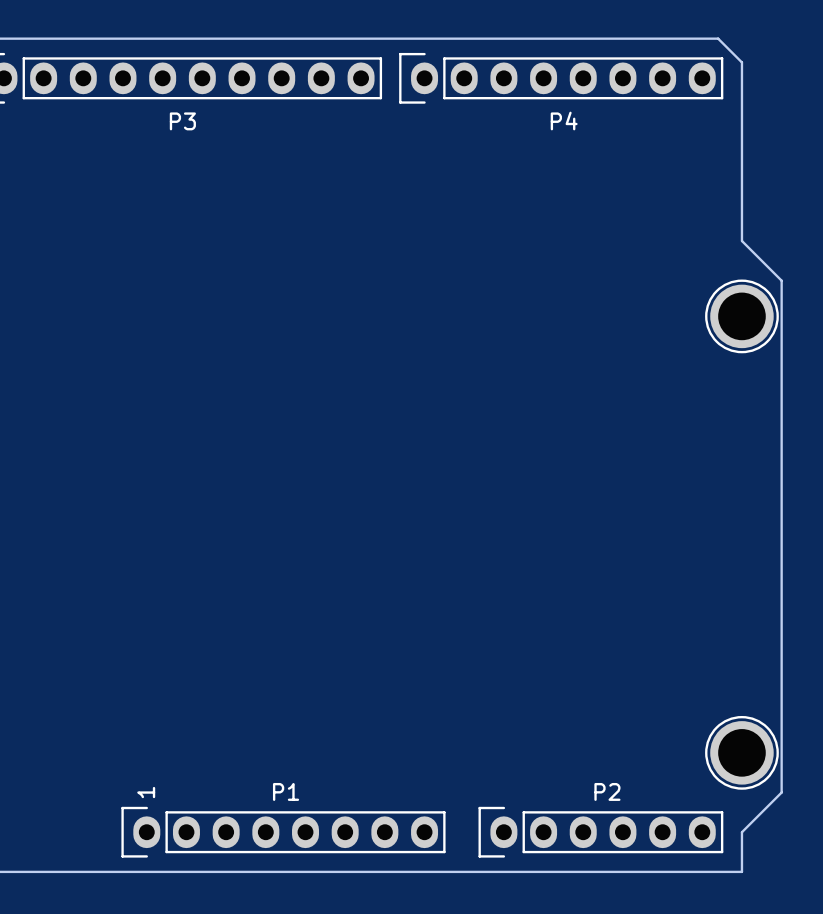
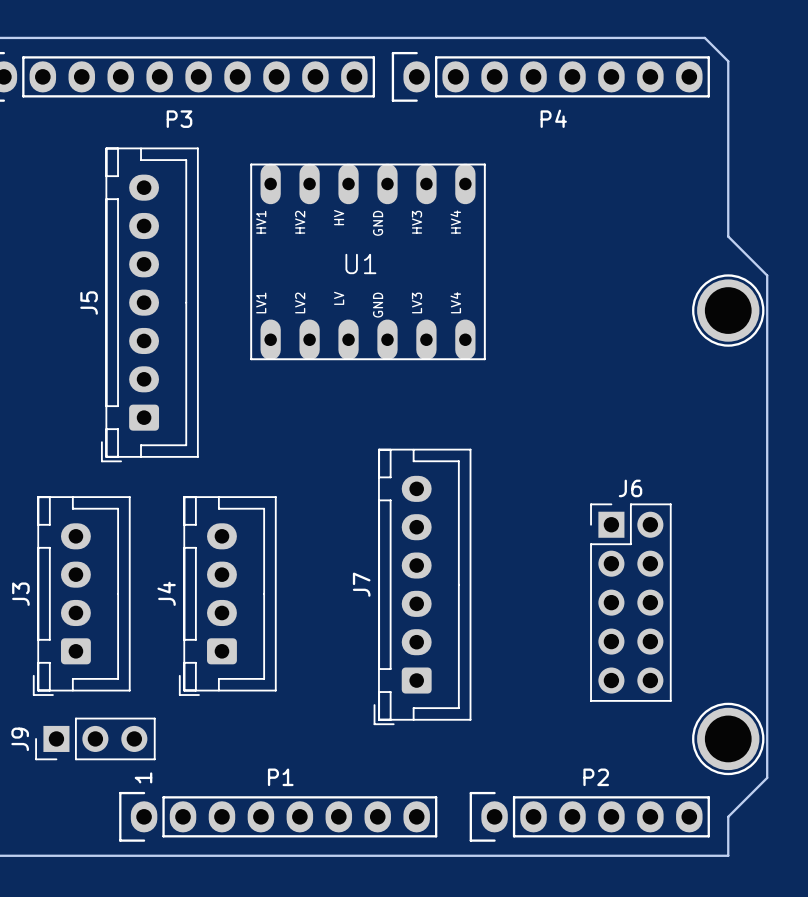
U1: none -> (368, 261)
J5: none -> (149, 304)
J7: none -> (422, 586)
J3: none -> (81, 596)
J4: none -> (227, 596)
J6: none -> (630, 602)
J9: none -> (95, 738)

